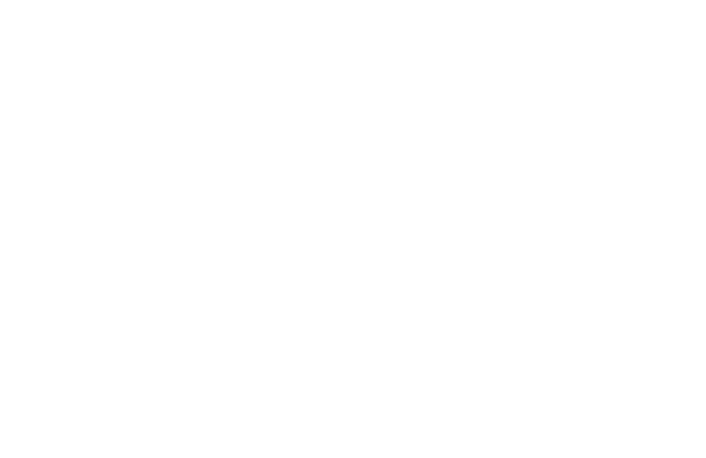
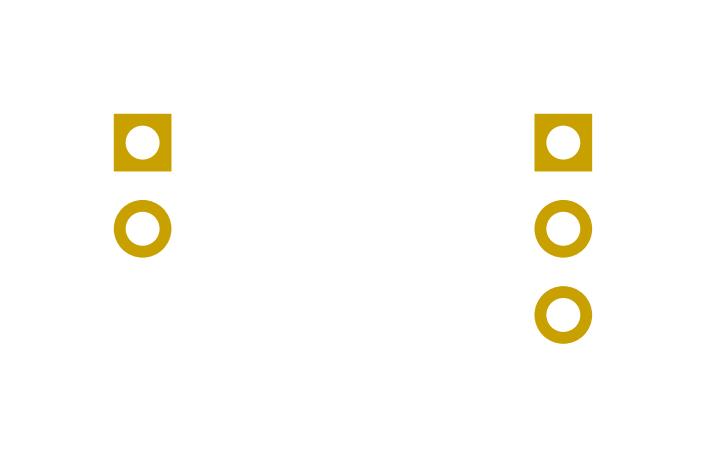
part: none -> (142, 185)
part: none -> (563, 228)

